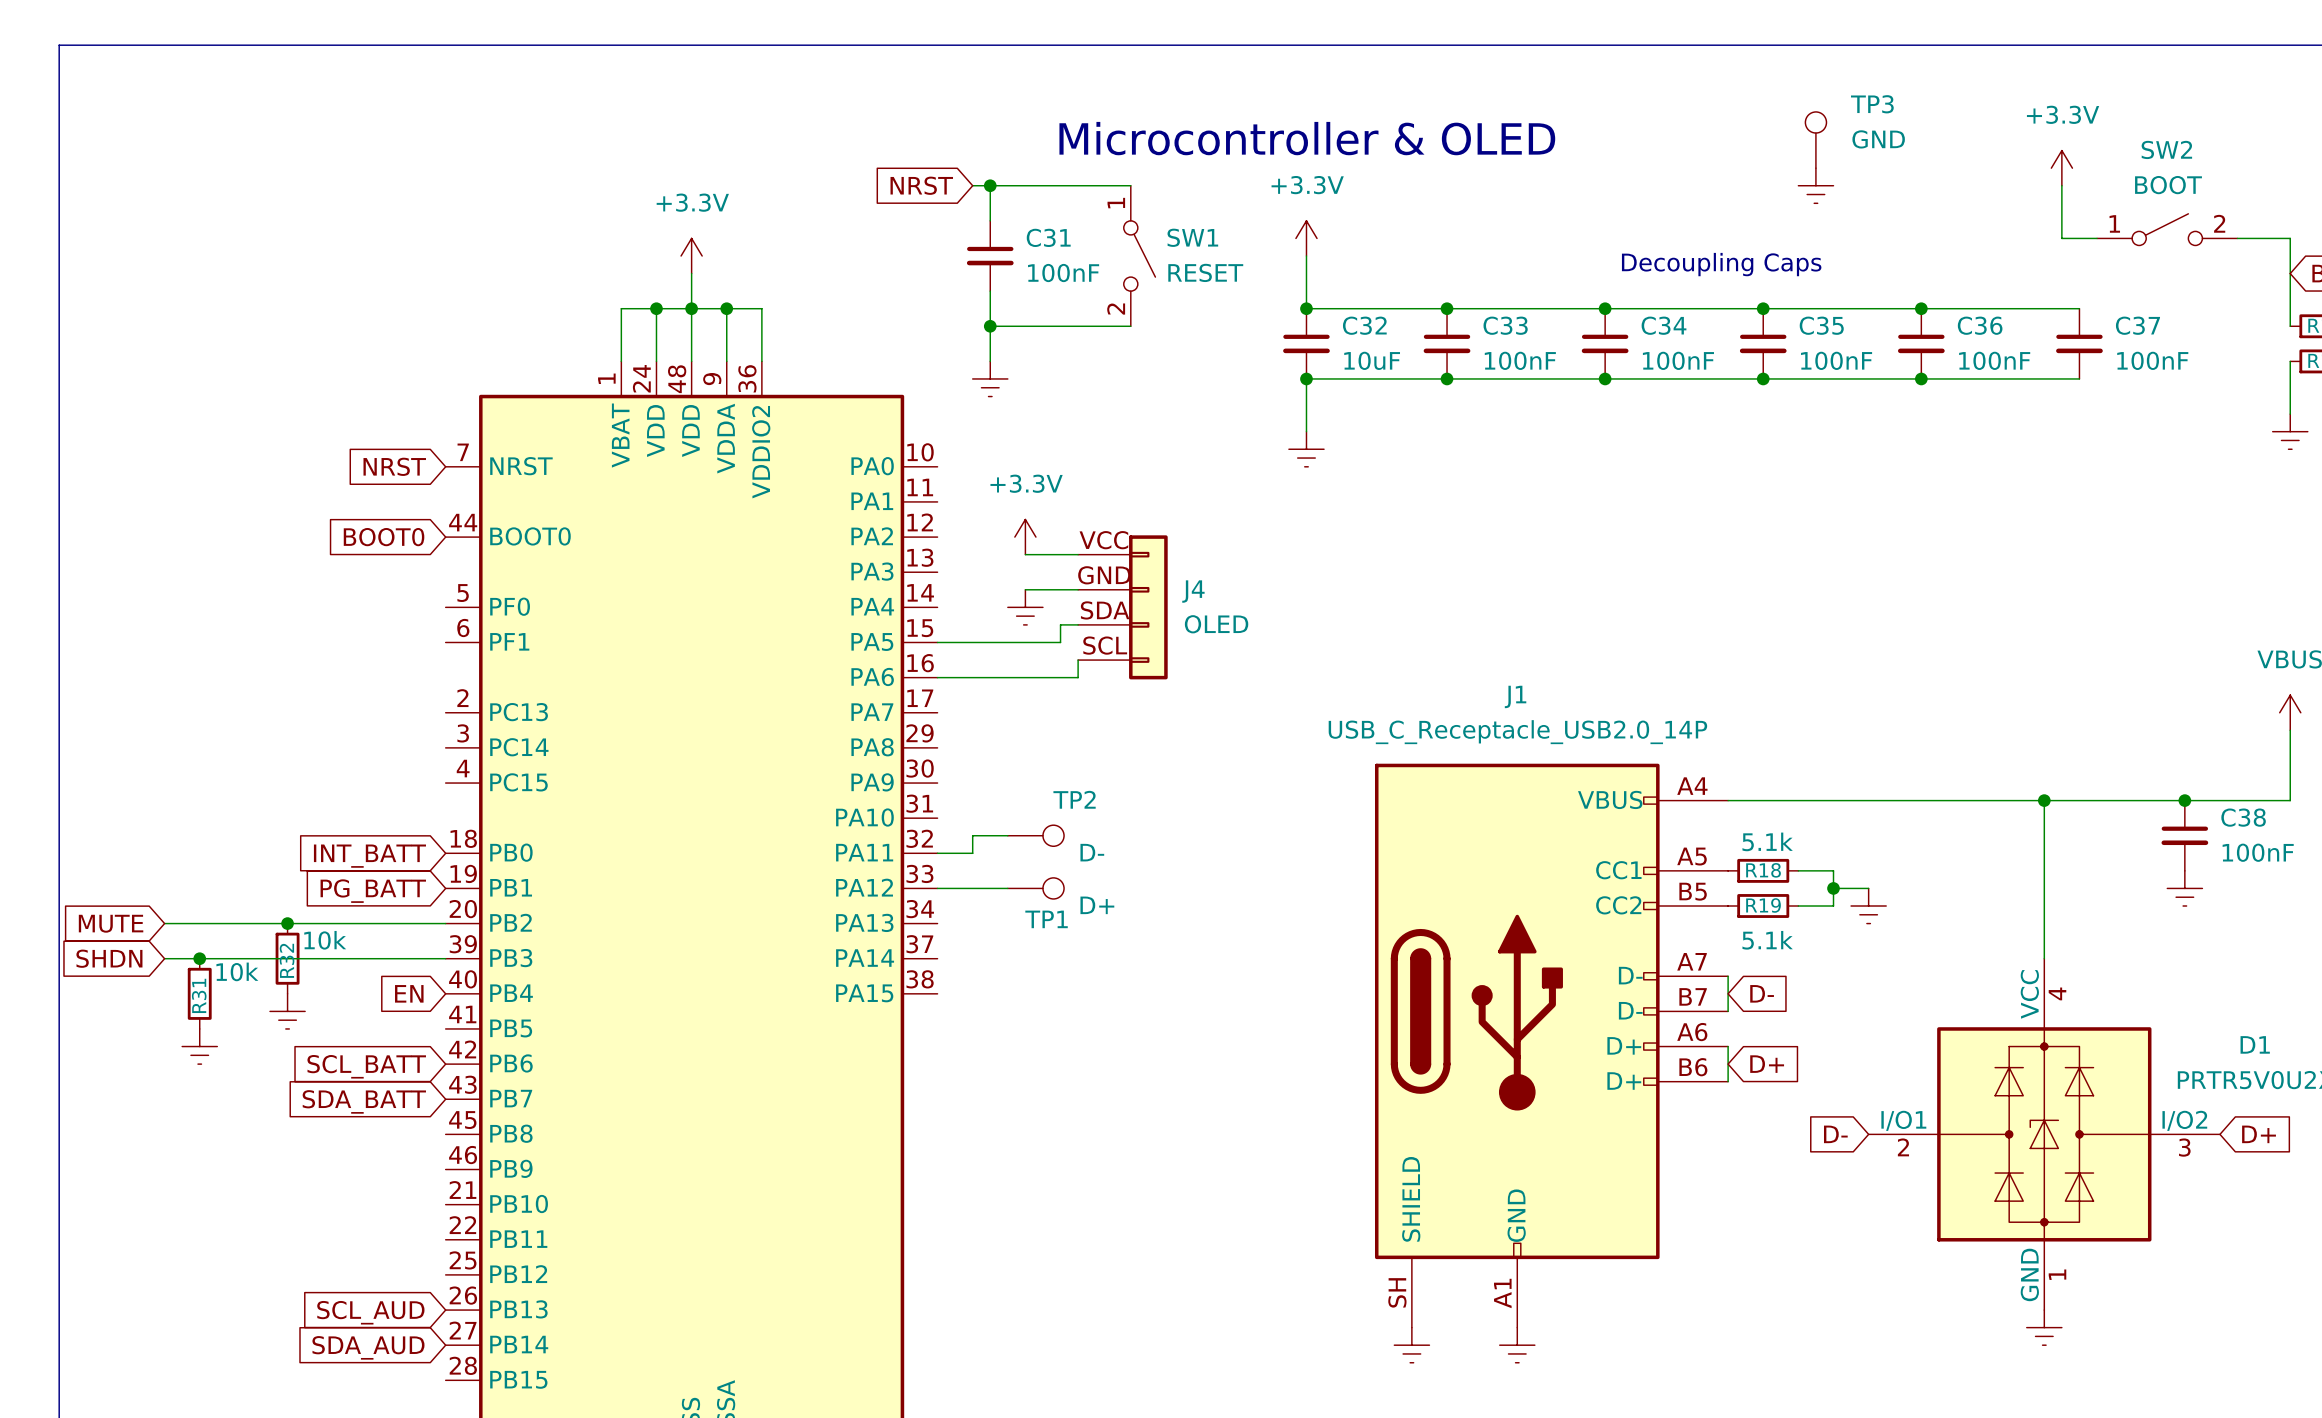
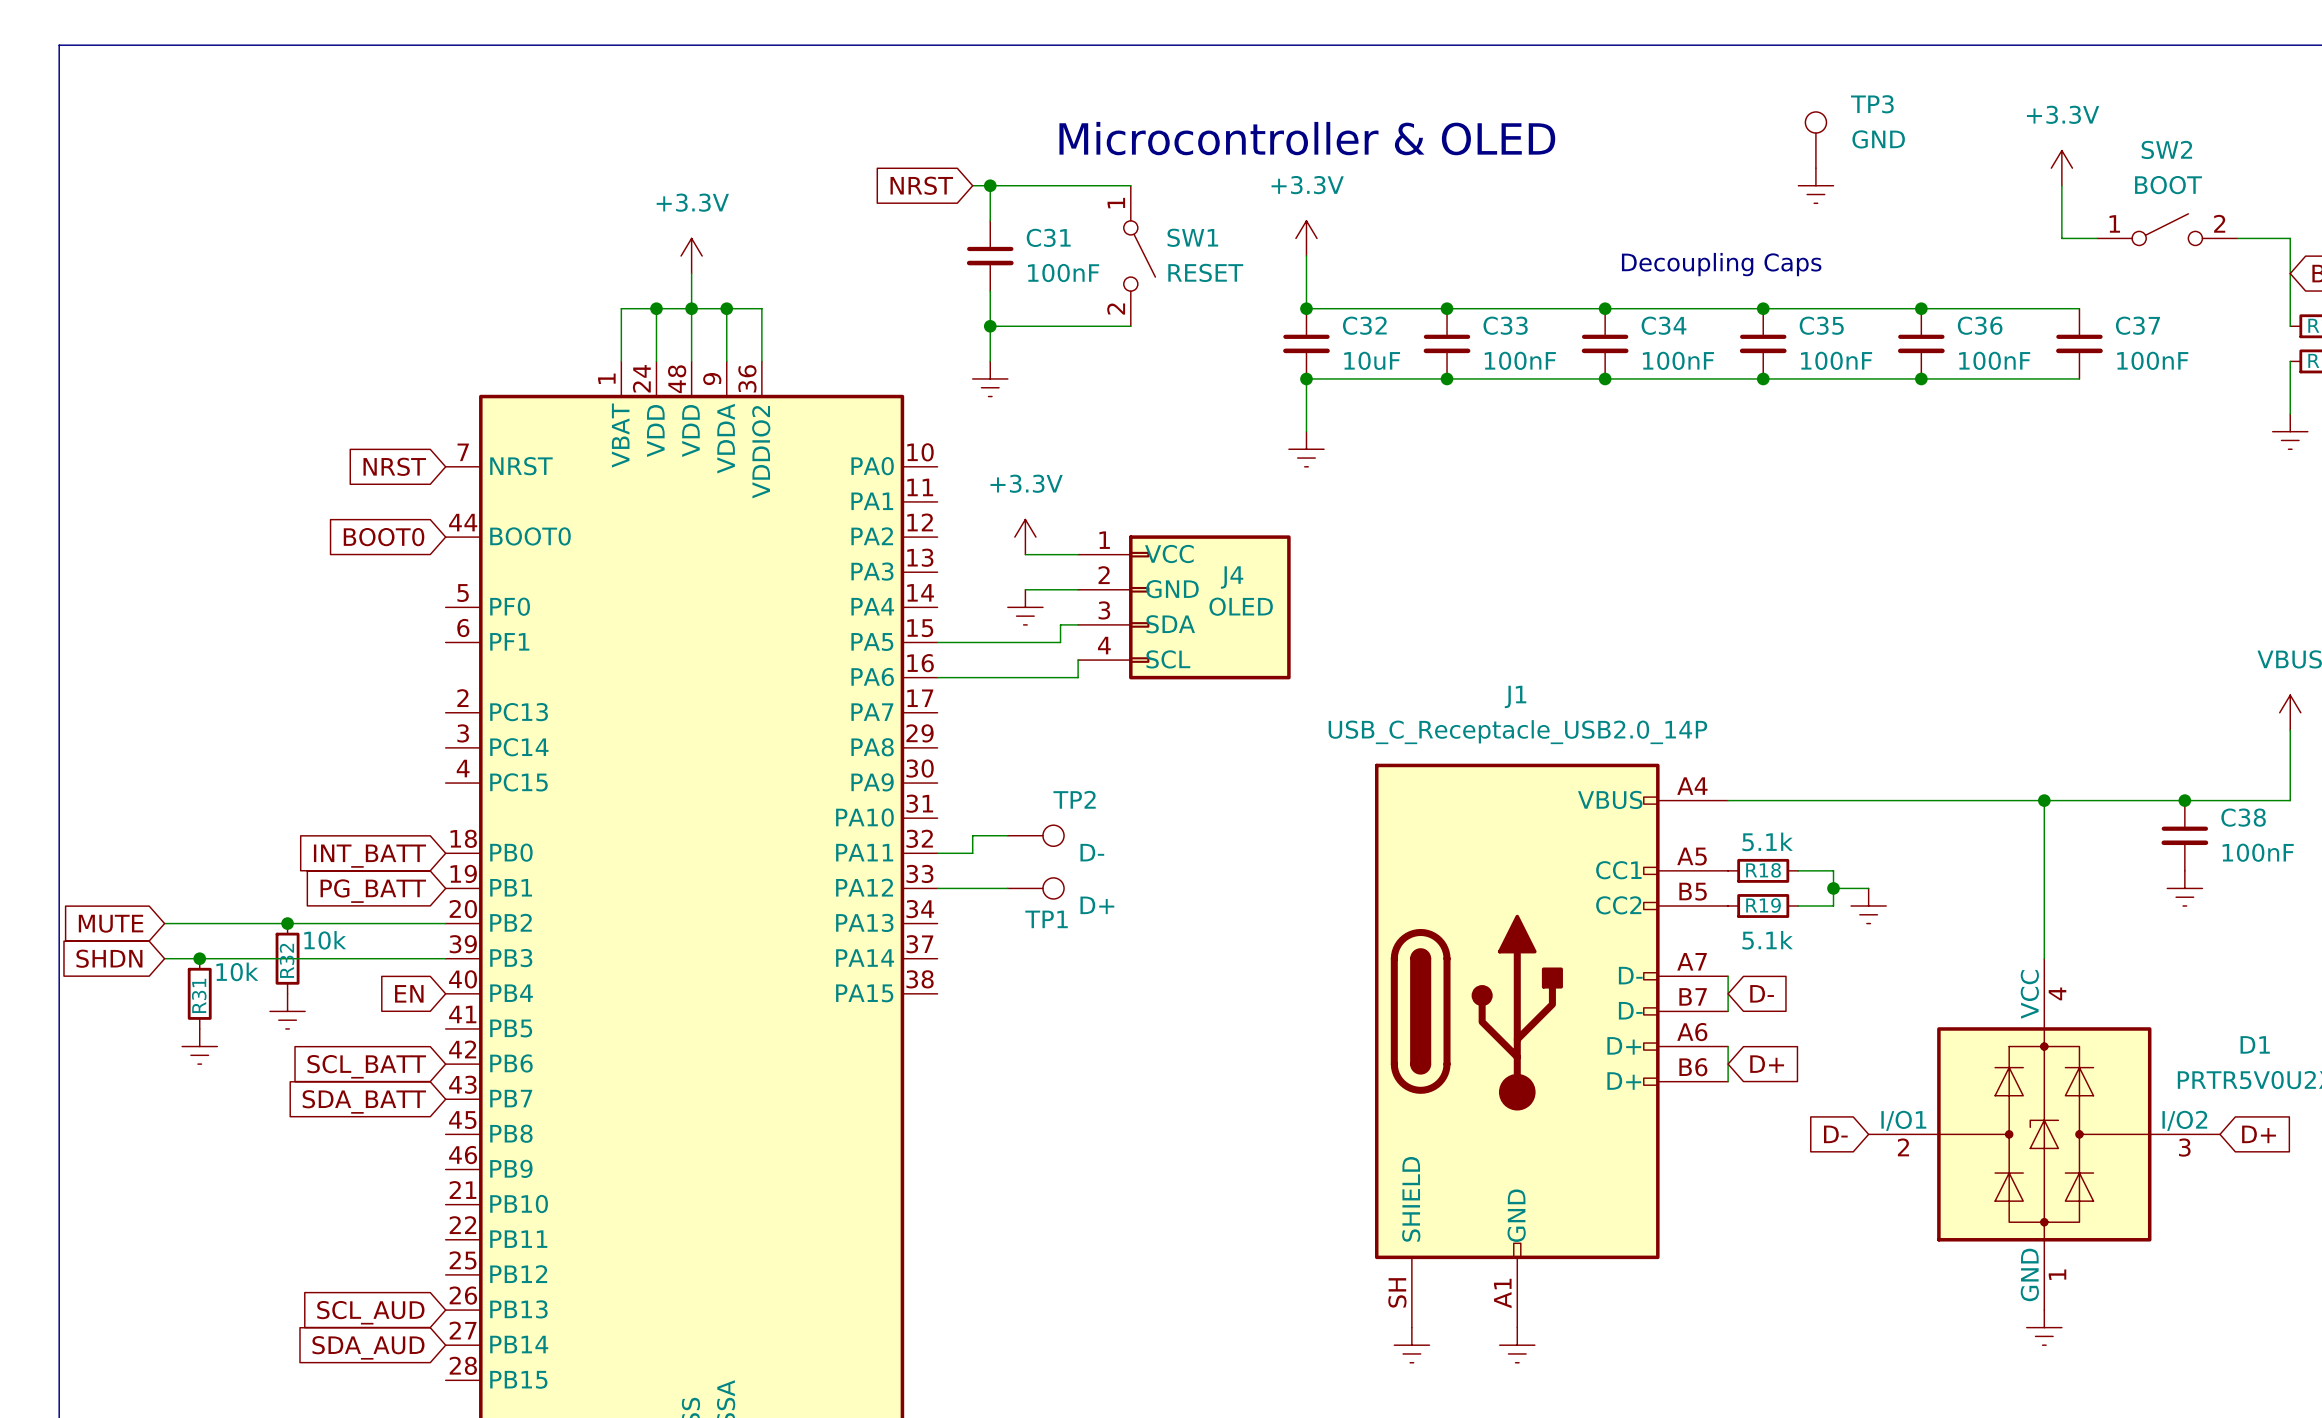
J4 symbol: [1078, 535, 1168, 680] -> [1078, 535, 1291, 680]
J4 value position: OLED (1216, 624) -> OLED (1241, 606)

